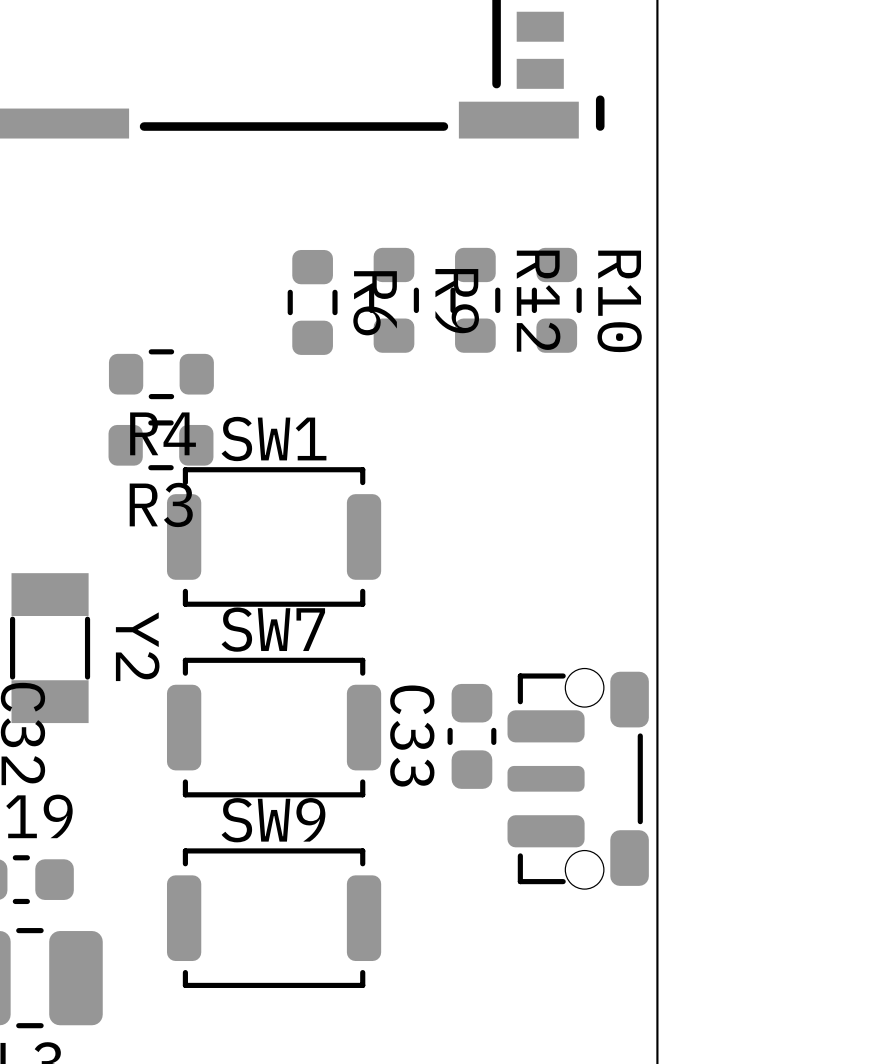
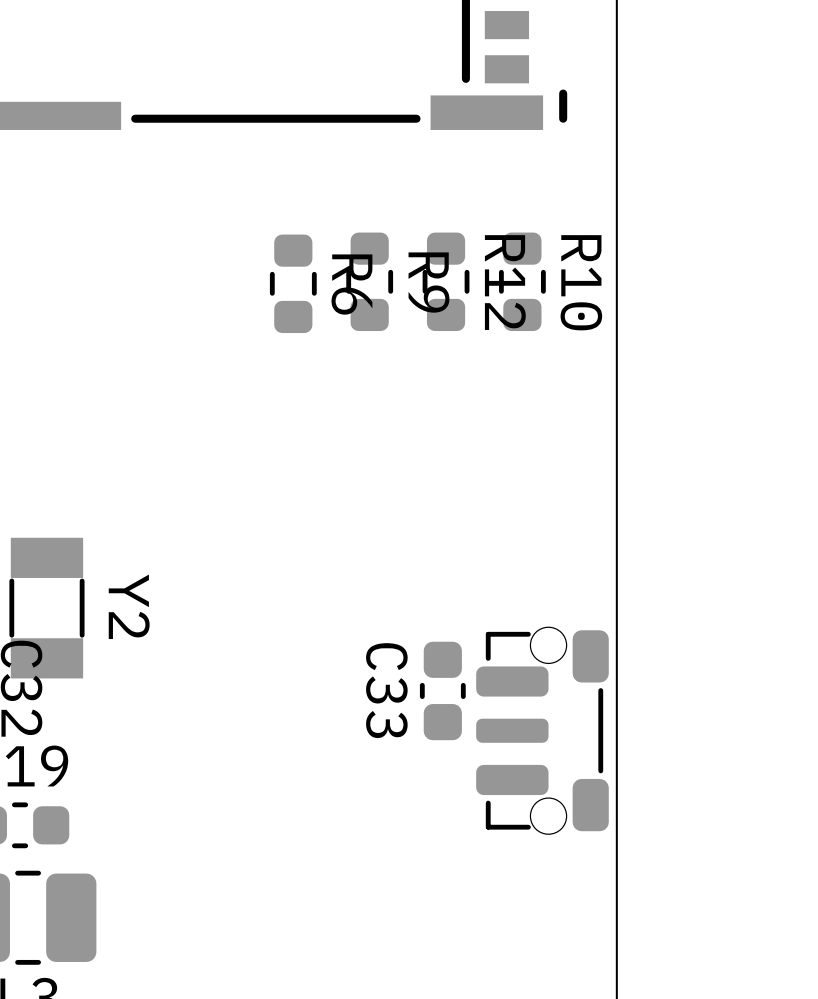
R4: (161, 374) -> none
R3: (160, 445) -> none
SW1: (274, 536) -> none
SW7: (274, 727) -> none
SW9: (274, 918) -> none

